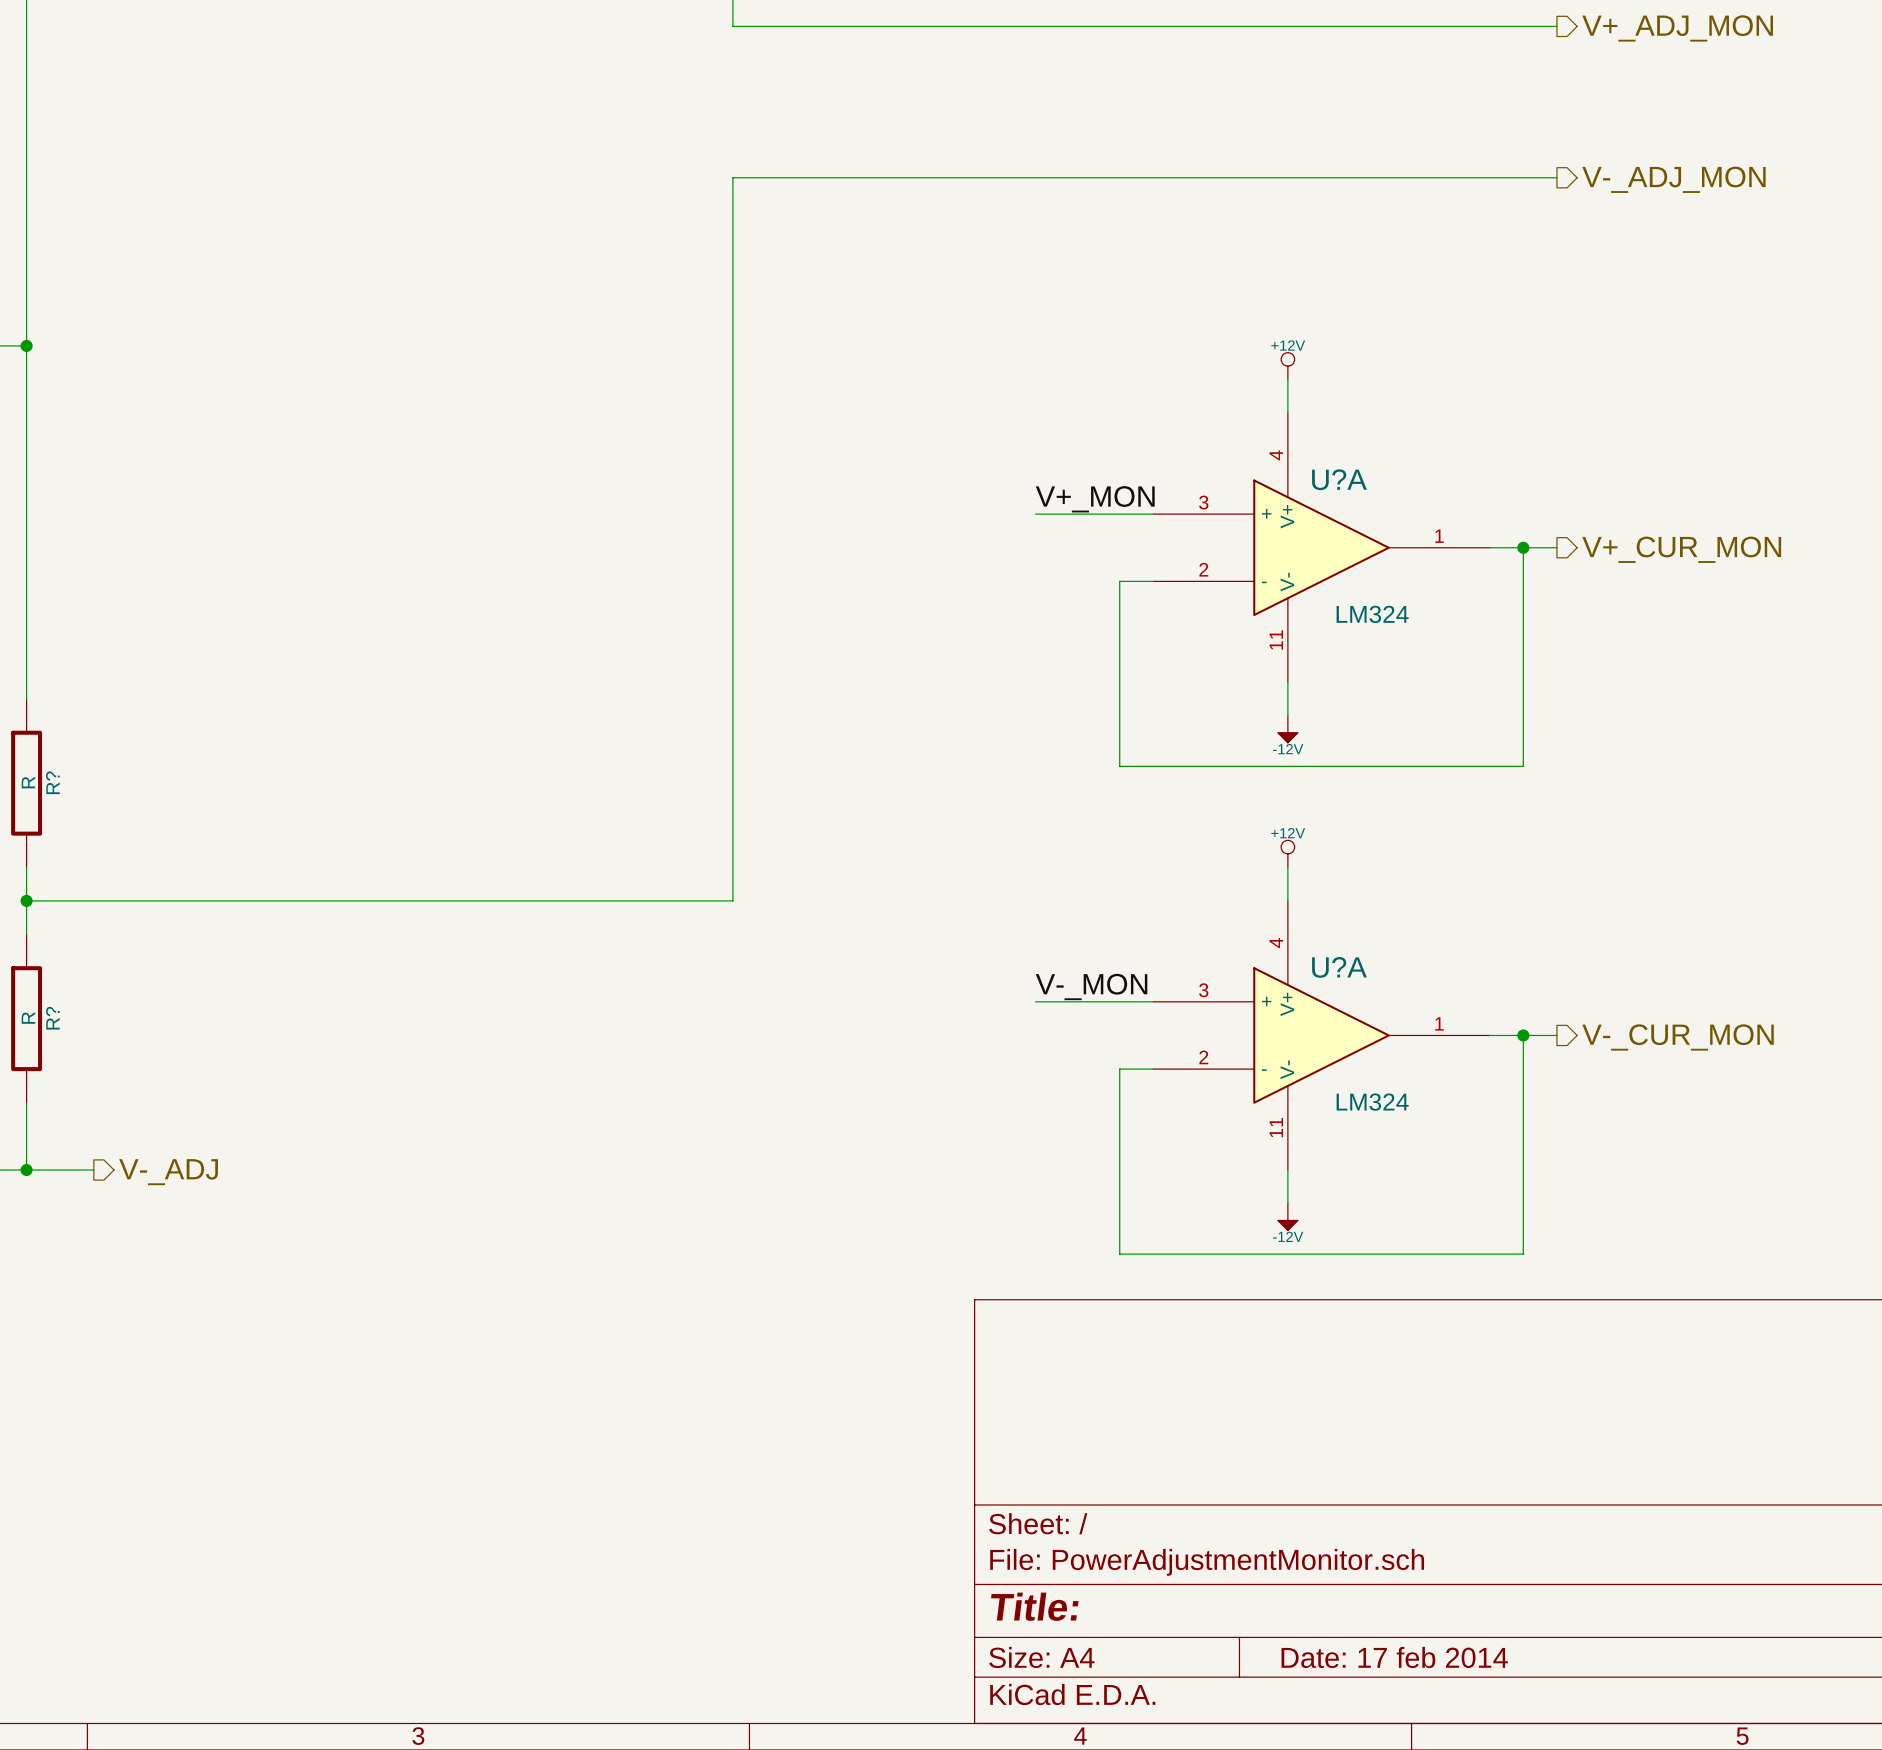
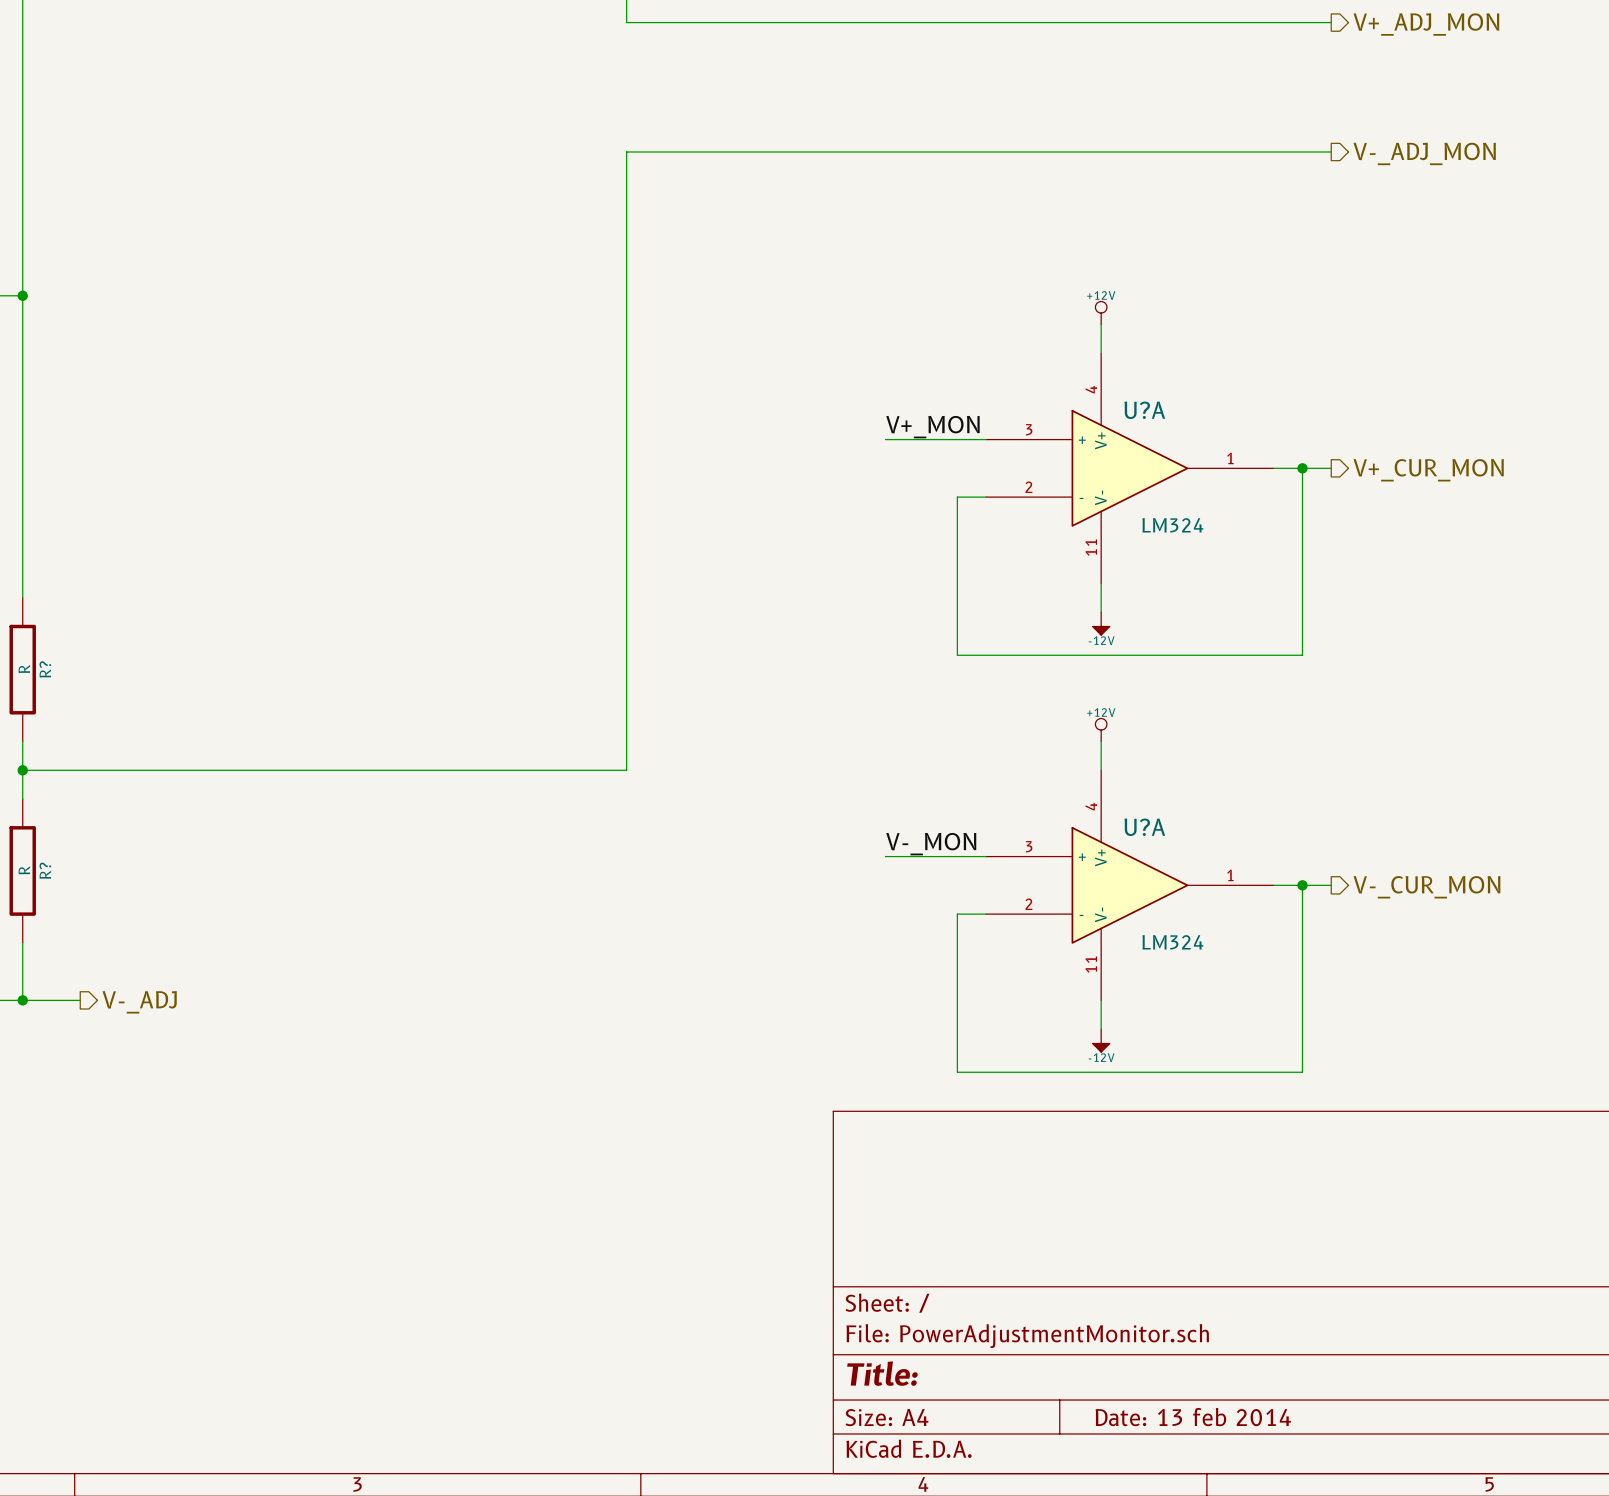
title block: Date: 17 feb 2014 (1394, 1657) -> Date: 13 feb 2014 (1193, 1417)

